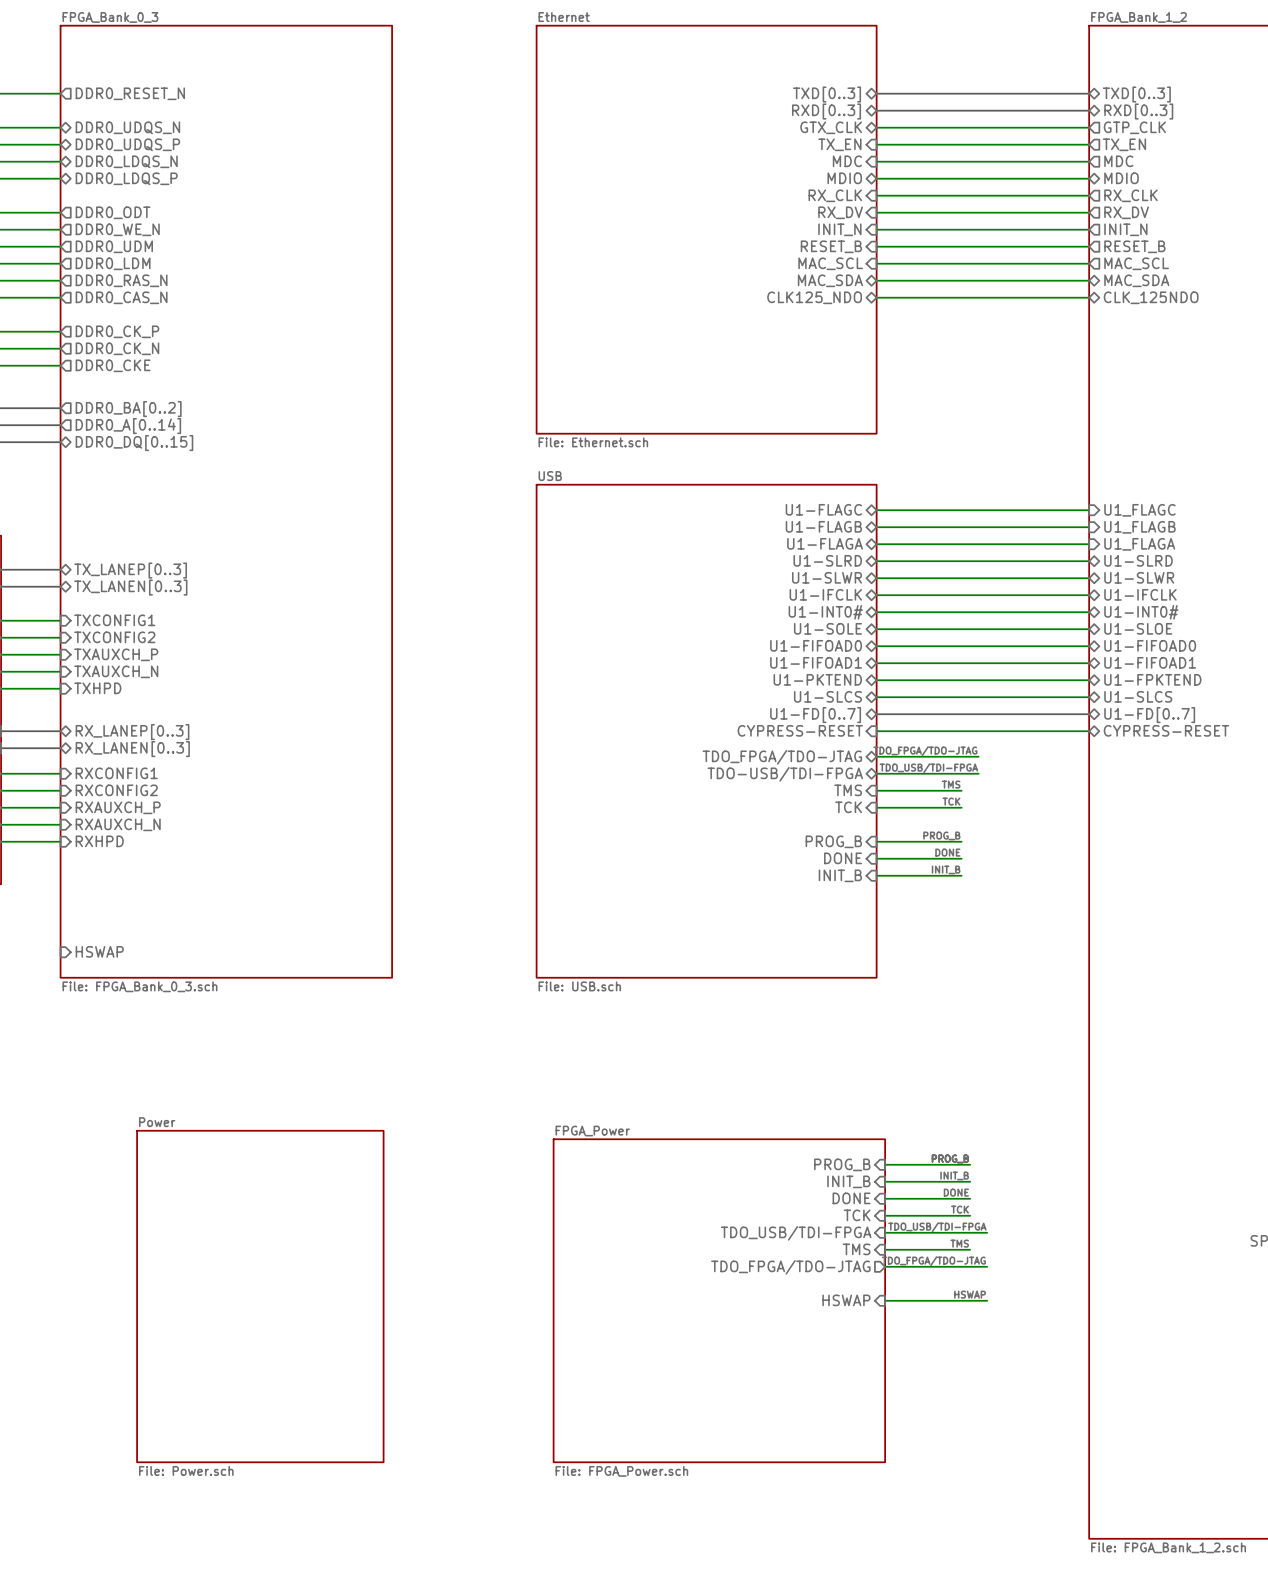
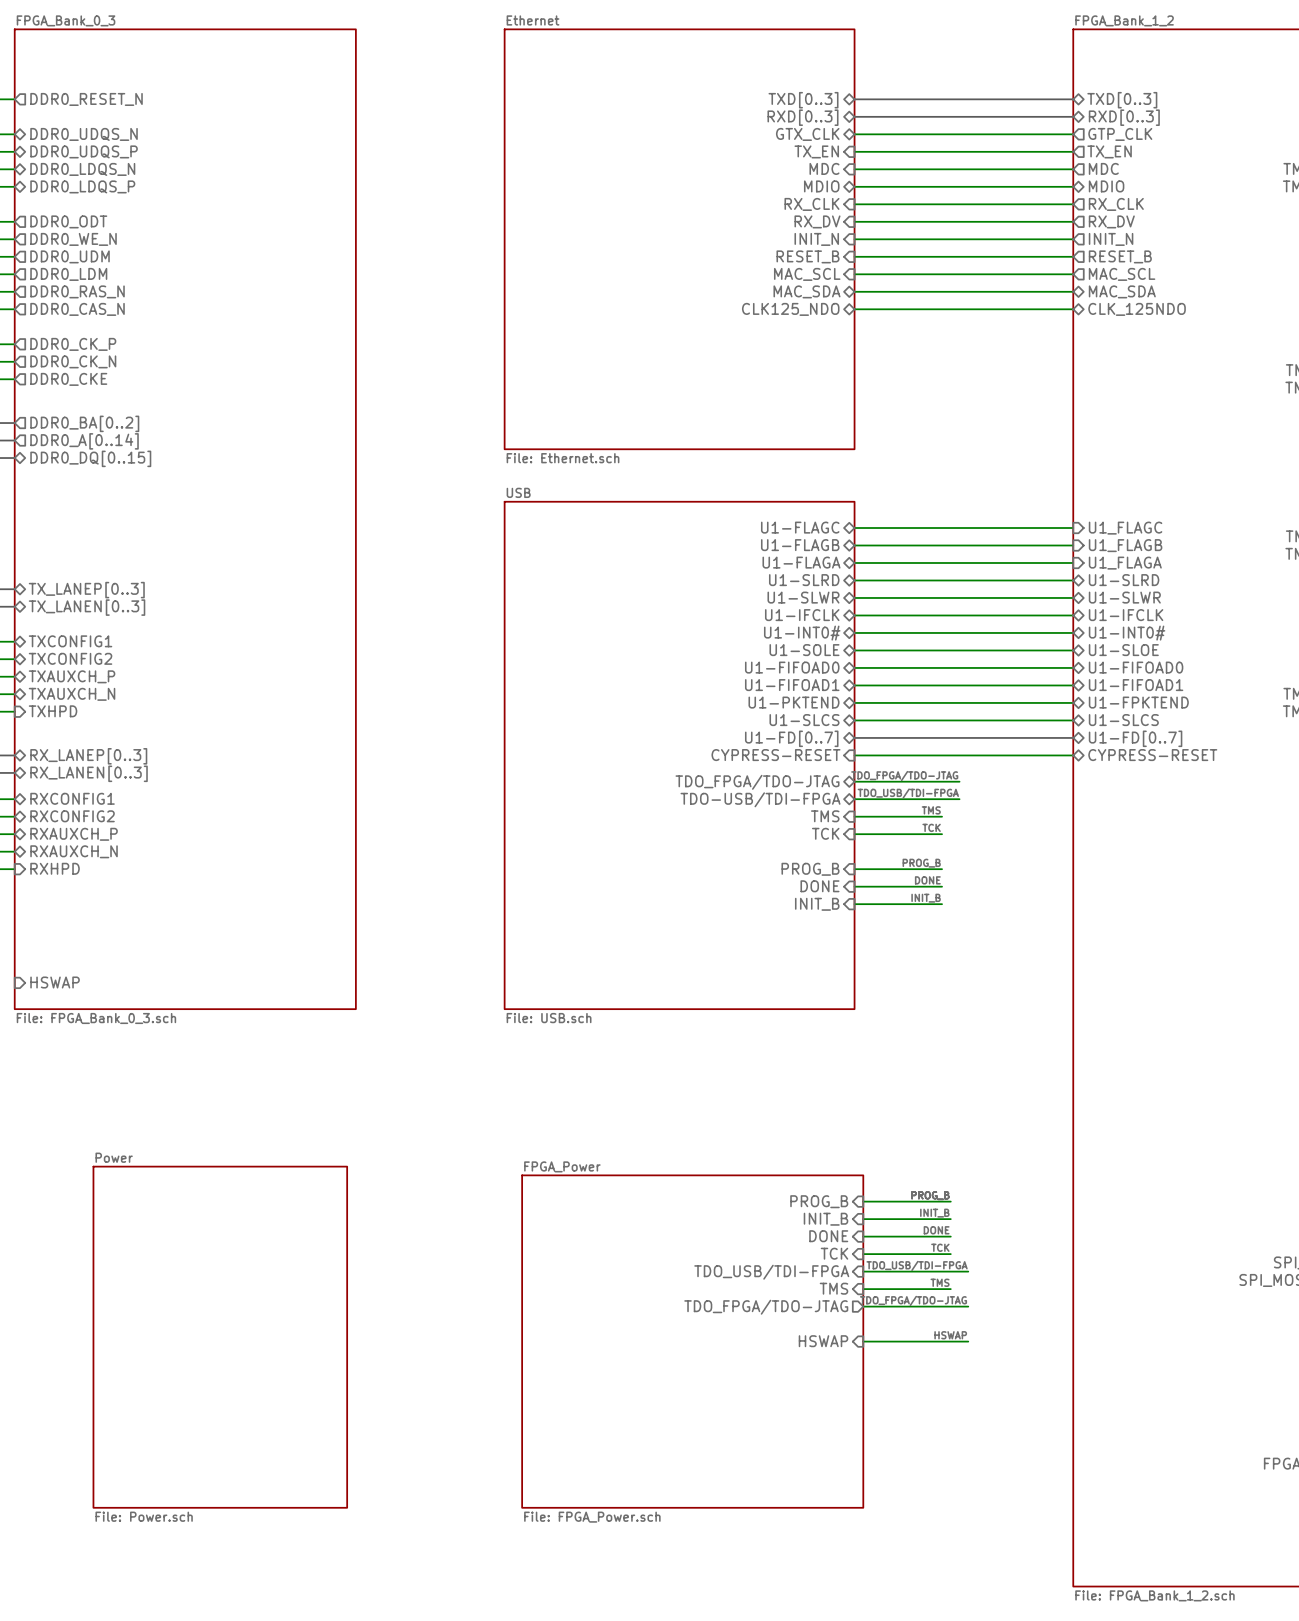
sheet pin shape: input (114, 620) -> bidirectional (70, 641)
sheet pin shape: input (114, 637) -> bidirectional (70, 658)
sheet pin shape: input (116, 654) -> bidirectional (72, 676)
sheet pin shape: input (116, 671) -> bidirectional (72, 694)
sheet pin shape: input (116, 773) -> bidirectional (72, 798)
sheet pin shape: input (116, 790) -> bidirectional (72, 816)
sheet pin shape: input (118, 807) -> bidirectional (74, 834)
sheet pin shape: input (118, 824) -> bidirectional (74, 851)

